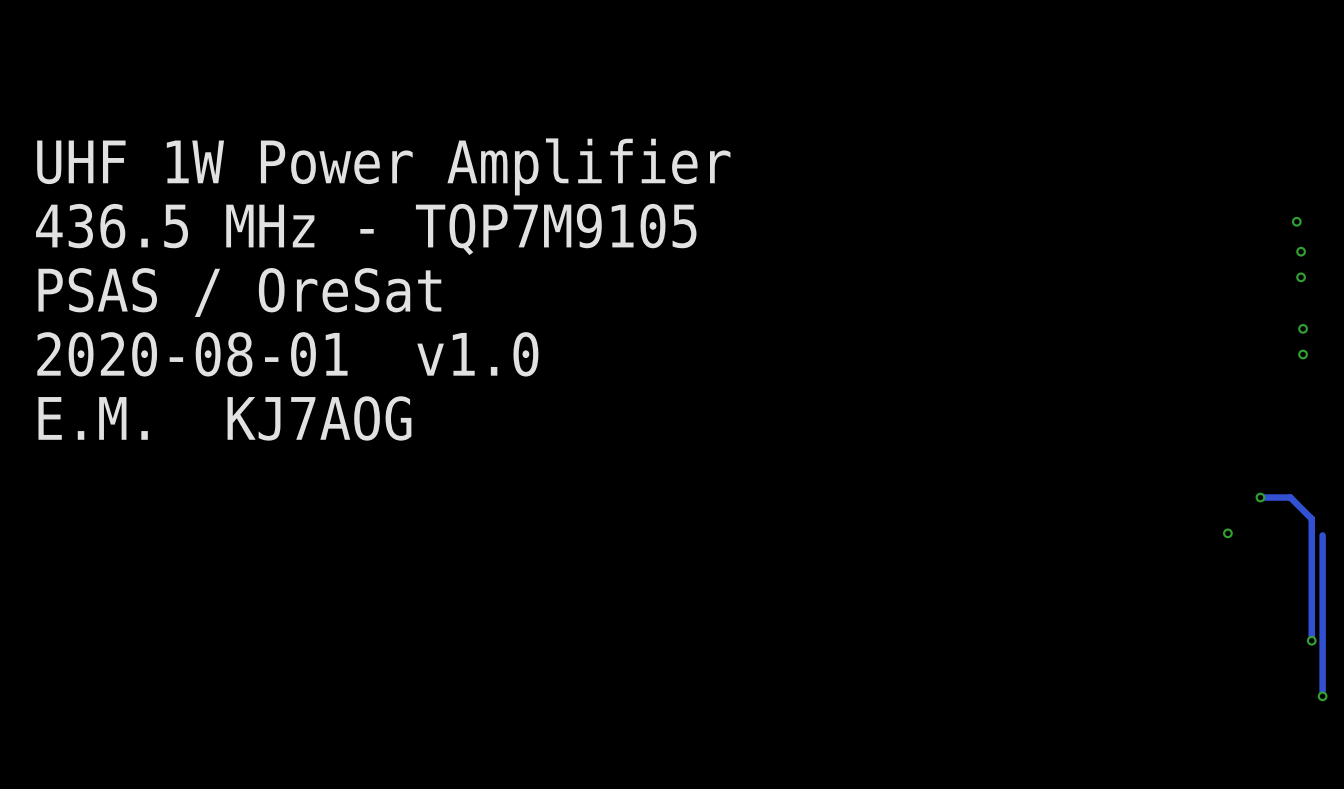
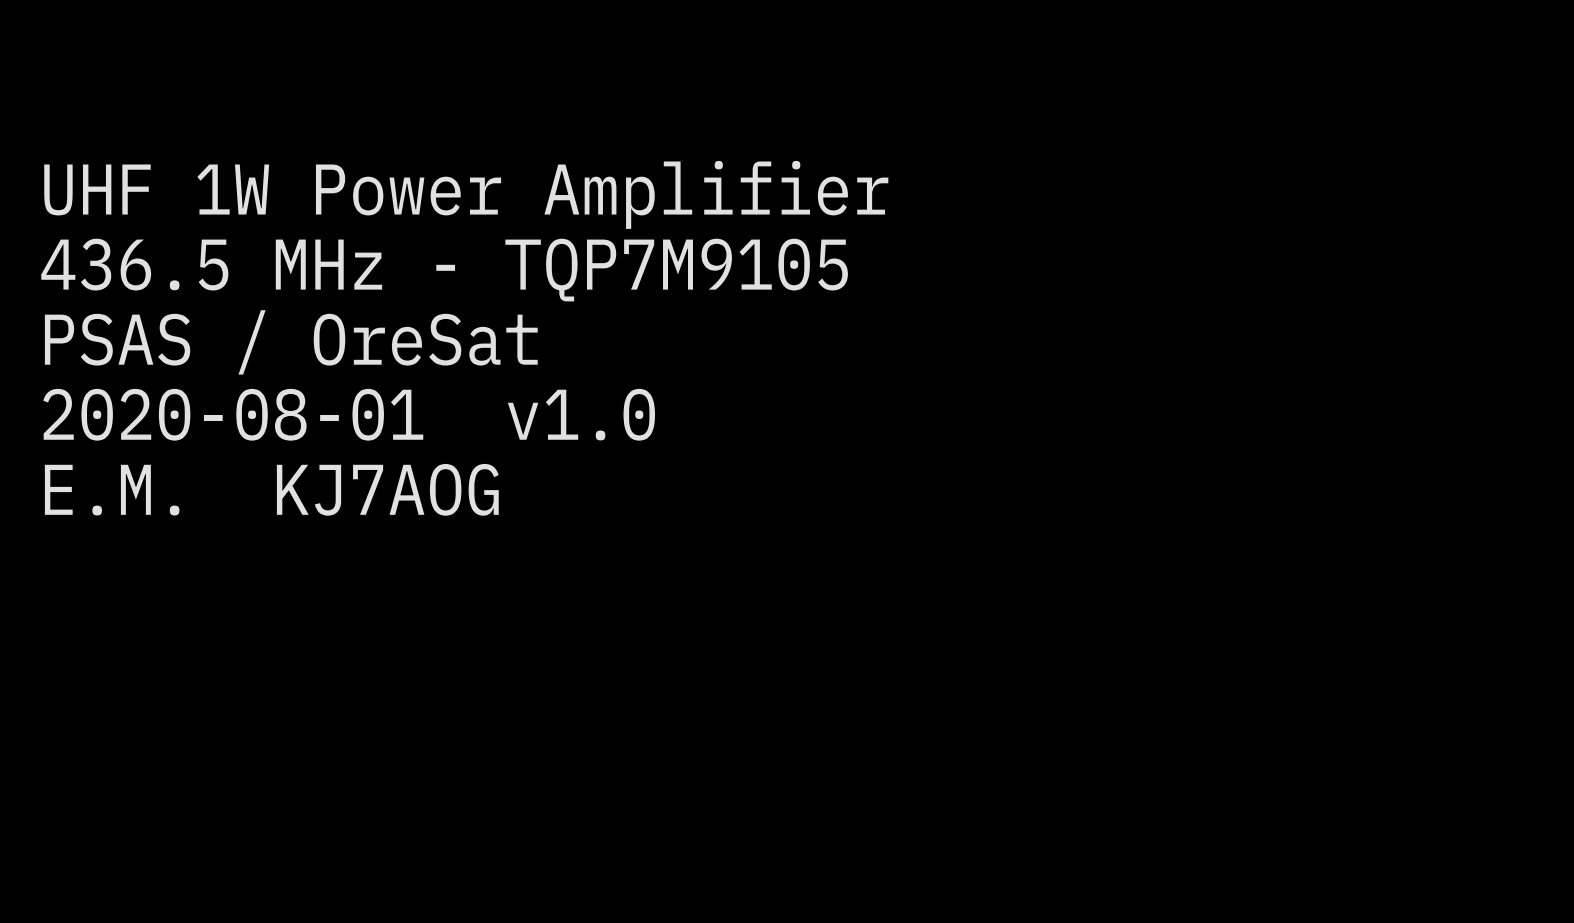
via: (1296, 221) -> none
via: (1301, 251) -> none
via: (1301, 277) -> none
via: (1303, 328) -> none
via: (1303, 354) -> none
track: (1260, 497) (1290, 497) (1311, 518) (1311, 640) -> none
via: (1260, 497) -> none
via: (1227, 533) -> none
track: (1322, 535) (1322, 696) -> none
via: (1311, 640) -> none
via: (1322, 696) -> none

